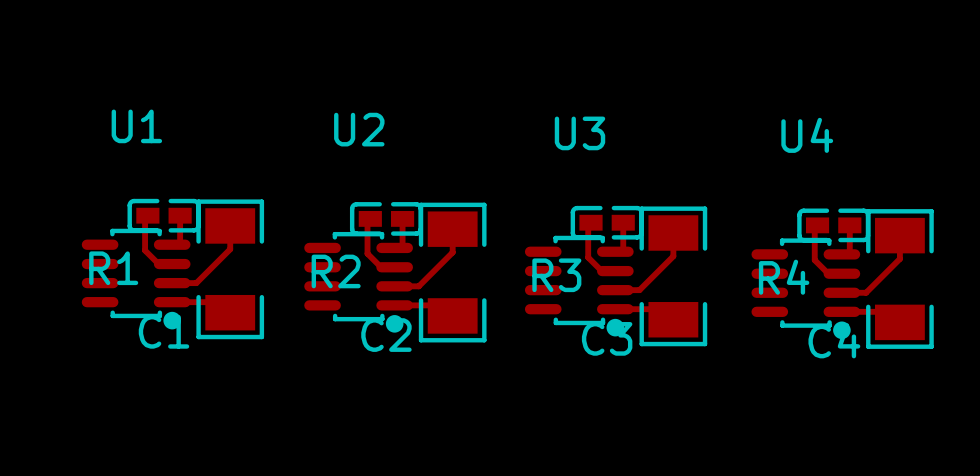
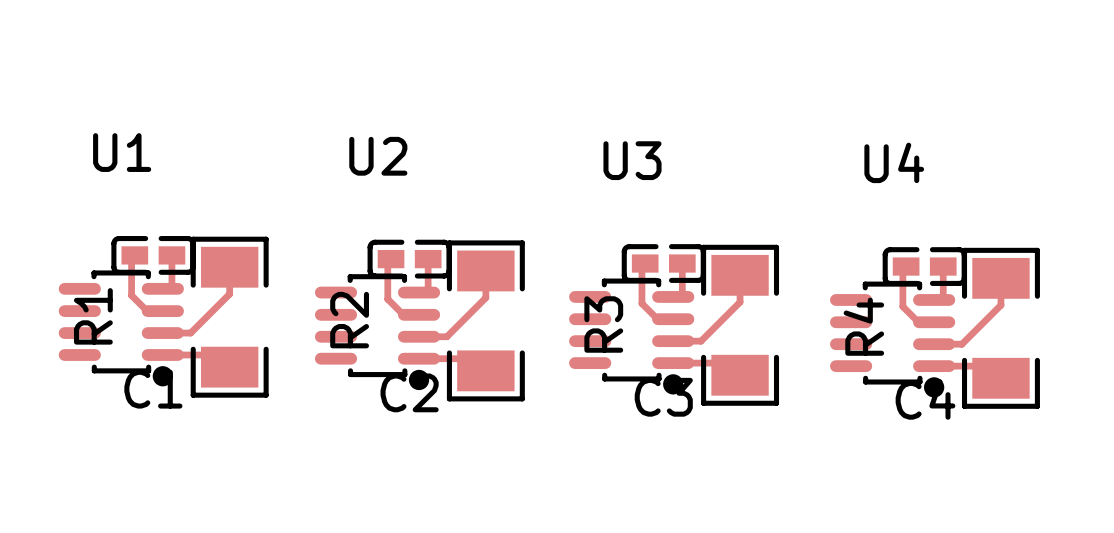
R1 name rotation: 0° (113, 268) -> 90° counterclockwise (93, 316)
R2 name rotation: 0° (336, 271) -> 90° counterclockwise (349, 320)
R3 name rotation: 0° (556, 275) -> 90° counterclockwise (603, 324)
R4 name rotation: 0° (784, 277) -> 90° counterclockwise (863, 326)

